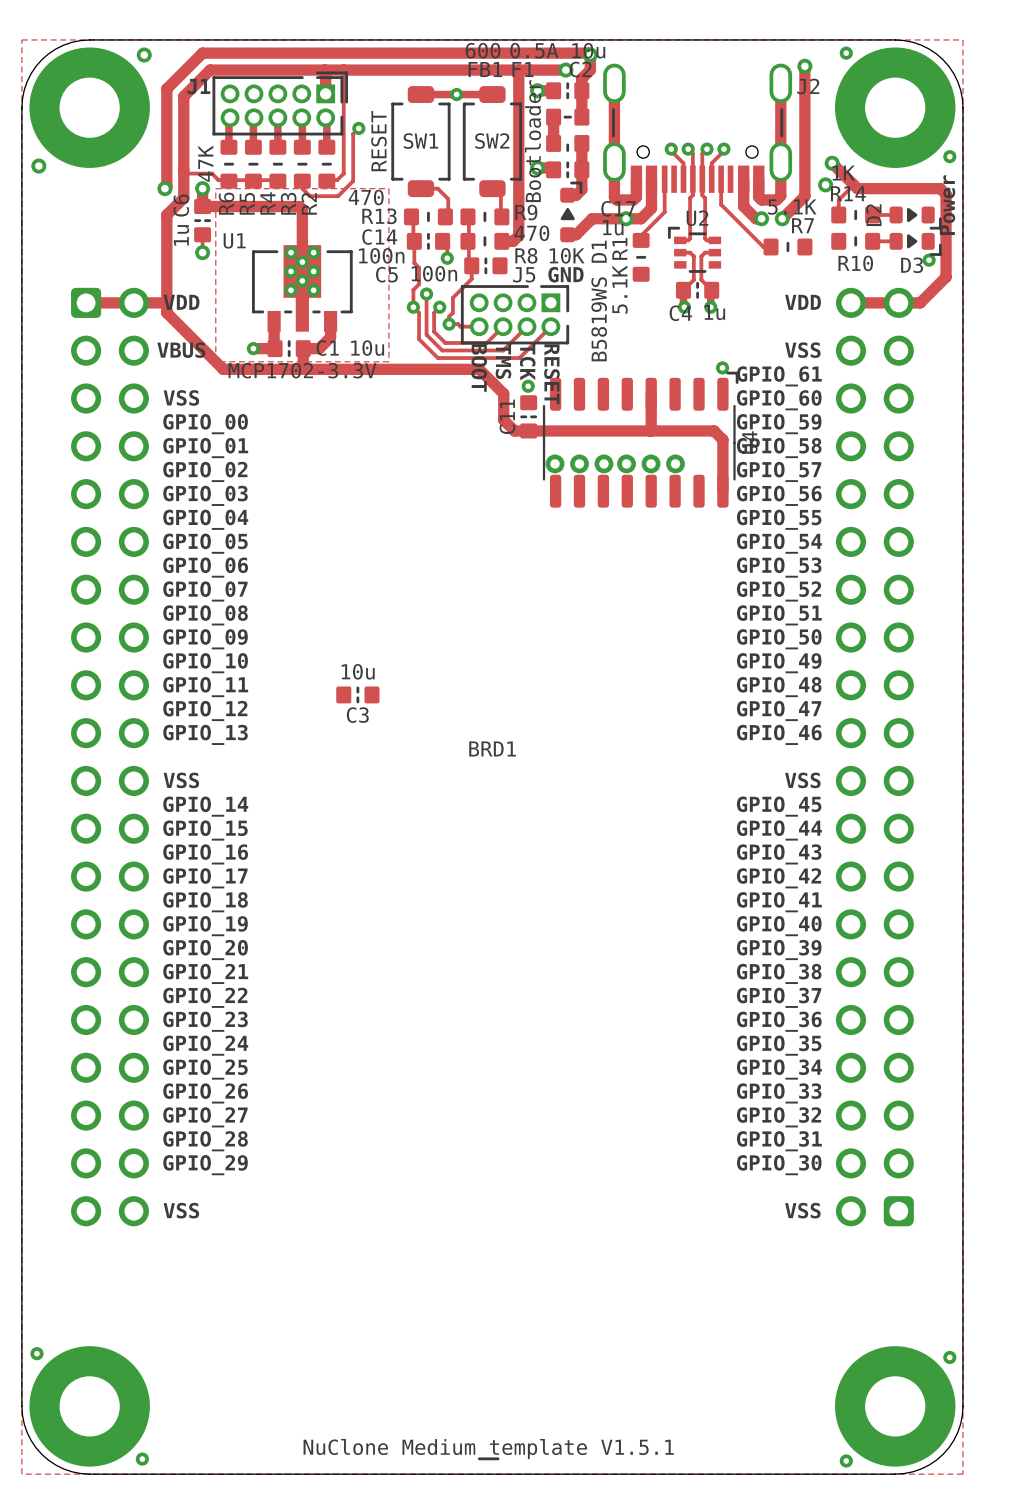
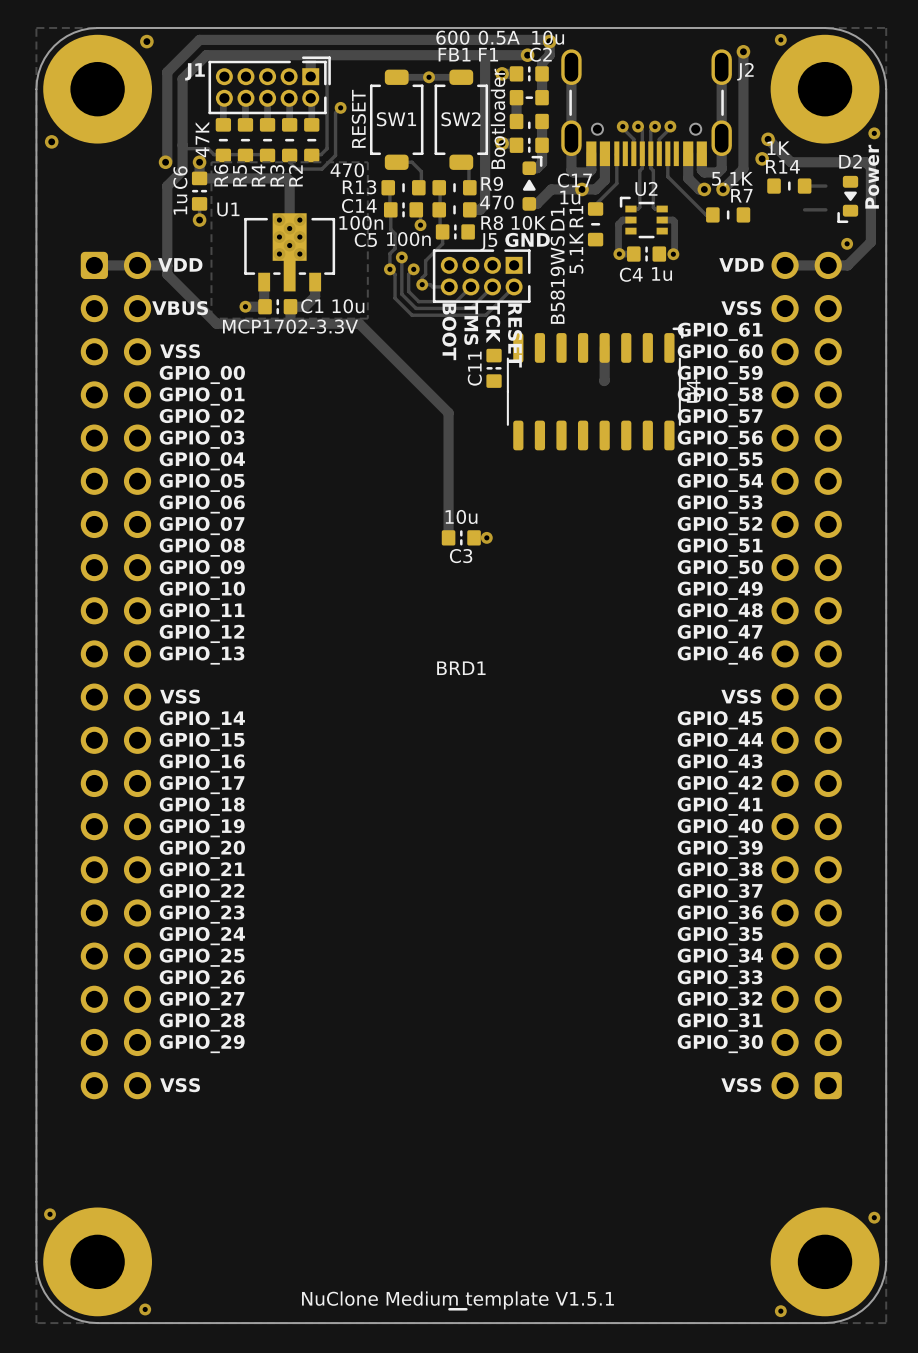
track: (853, 184) (838, 199) (838, 215) -> none
D2 rotation: 0° (915, 218) -> 90° clockwise (847, 199)
R10: (855, 241) -> none
D3: (915, 244) -> none
track: (680, 252) (690, 252) (693, 256) (693, 279) (683, 290) (684, 307) -> (630, 220) (622, 220) (618, 224) (618, 253) (633, 254)
track: (714, 252) (705, 252) (701, 256) (701, 279) (711, 290) (710, 307) -> (662, 220) (674, 221) (673, 254)
via position: (929, 260) -> (847, 243)
via: none -> (619, 254)
via: none -> (673, 254)
via: (684, 307) -> none
via: (710, 307) -> none
track: (221, 367) (223, 369) (300, 369) (302, 367) (304, 369) (479, 369) (503, 393) (503, 420) (514, 430) (714, 430) (722, 439) (722, 491) -> (216, 323) (359, 323) (448, 412) (448, 537)
via: (722, 367) -> none
via: (528, 386) -> none
part: (555, 463) -> none
part: (579, 463) -> none
part: (603, 463) -> none
part: (626, 463) -> none
part: (651, 463) -> none
part: (675, 463) -> none
via: none -> (486, 537)
C3 position: (357, 694) -> (461, 537)

